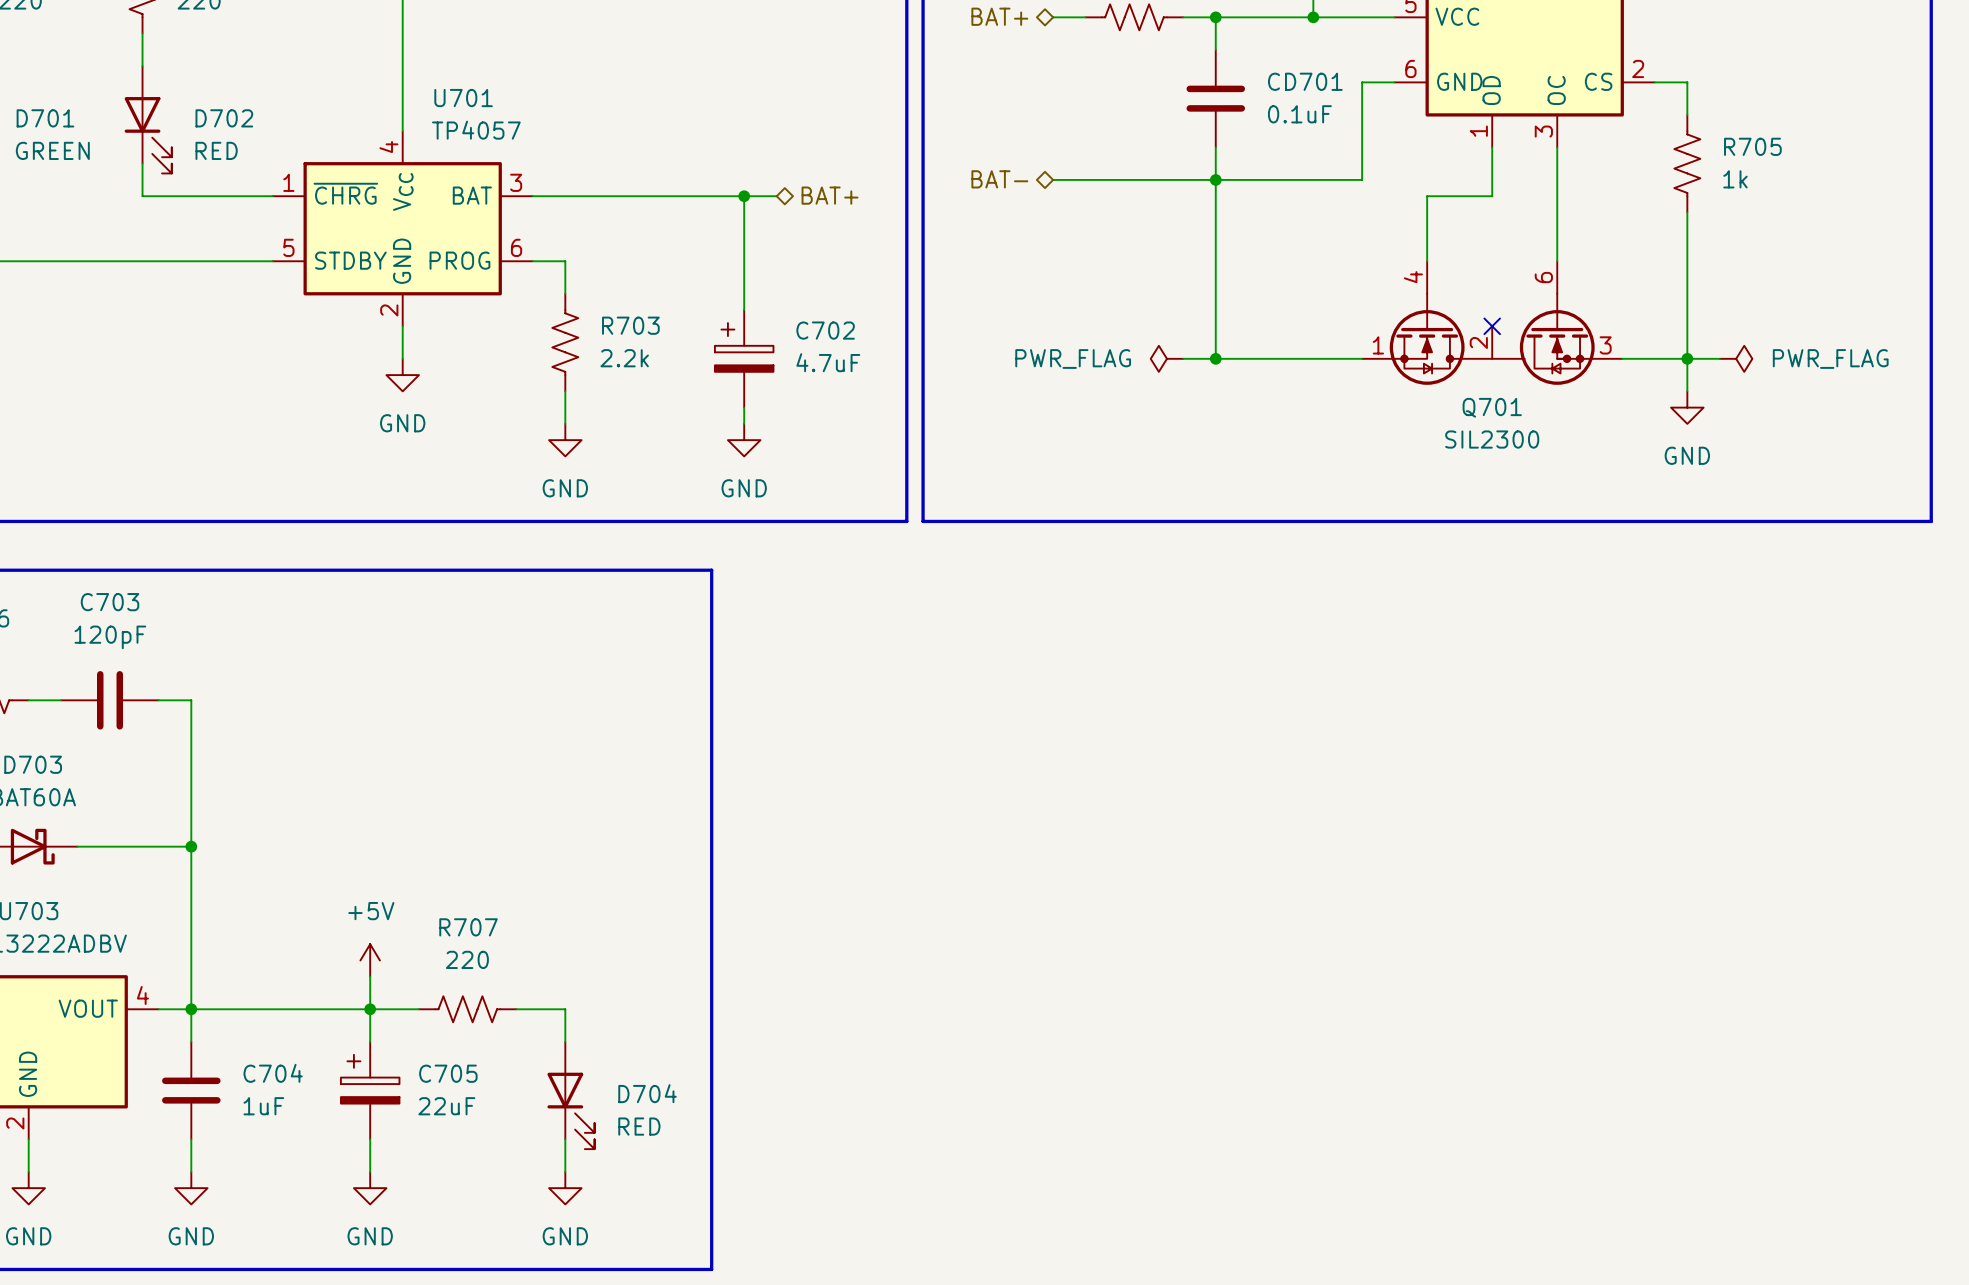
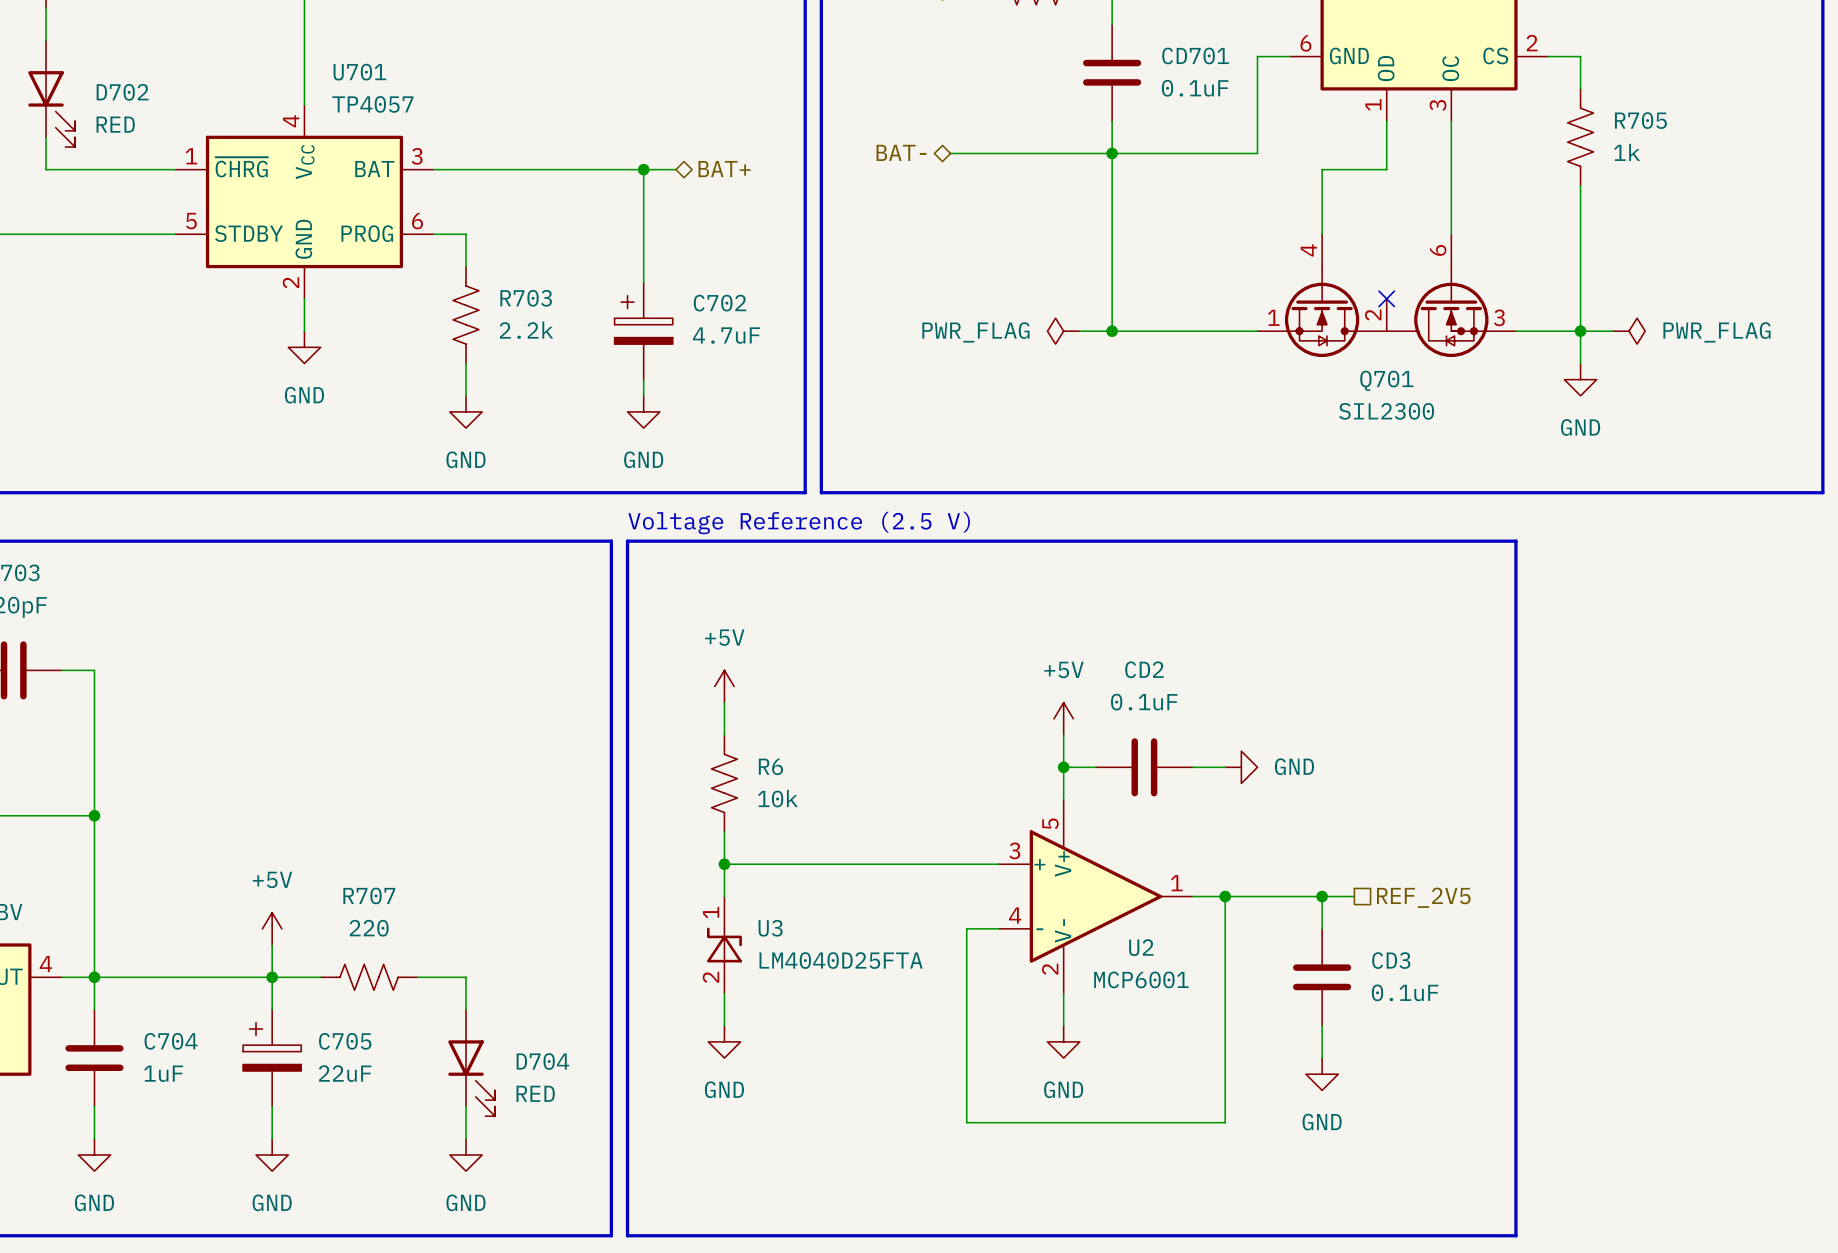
text: none -> Voltage Reference (2.5 V) (799, 522)
line: none -> (627, 541) (1515, 541) (1515, 1235) (627, 1235) (627, 541)
power symbol: none -> +5V (724, 686)
wire: none -> (724, 702) (724, 735)
power symbol: none -> +5V (1063, 718)
wire: none -> (1063, 735) (1063, 799)
wire: none -> (1063, 767) (1095, 767)
junction: none -> (1063, 767)
CD2: none -> 0.1uF (1144, 767)
wire: none -> (1192, 767) (1225, 767)
power symbol: none -> GND (1241, 767)
R6: none -> 10k (724, 783)
wire: none -> (724, 831) (724, 896)
wire: none -> (724, 864) (999, 864)
junction: none -> (724, 864)
U2: none -> MCP6001 (1095, 896)
wire: none -> (1192, 896) (1354, 896)
wire: none -> (1225, 896) (1225, 1122) (966, 1122) (966, 928) (999, 928)
junction: none -> (1225, 896)
wire: none -> (1322, 896) (1322, 928)
junction: none -> (1322, 896)
hierarchical label: none -> REF_2V5 (1423, 897)
U3: none -> LM4040D25FTA (724, 945)
CD3: none -> 0.1uF (1322, 977)
wire: none -> (724, 993) (724, 1025)
wire: none -> (1063, 993) (1063, 1025)
wire: none -> (1322, 1025) (1322, 1058)
power symbol: none -> GND (724, 1041)
power symbol: none -> GND (1063, 1041)
power symbol: none -> GND (1322, 1074)

